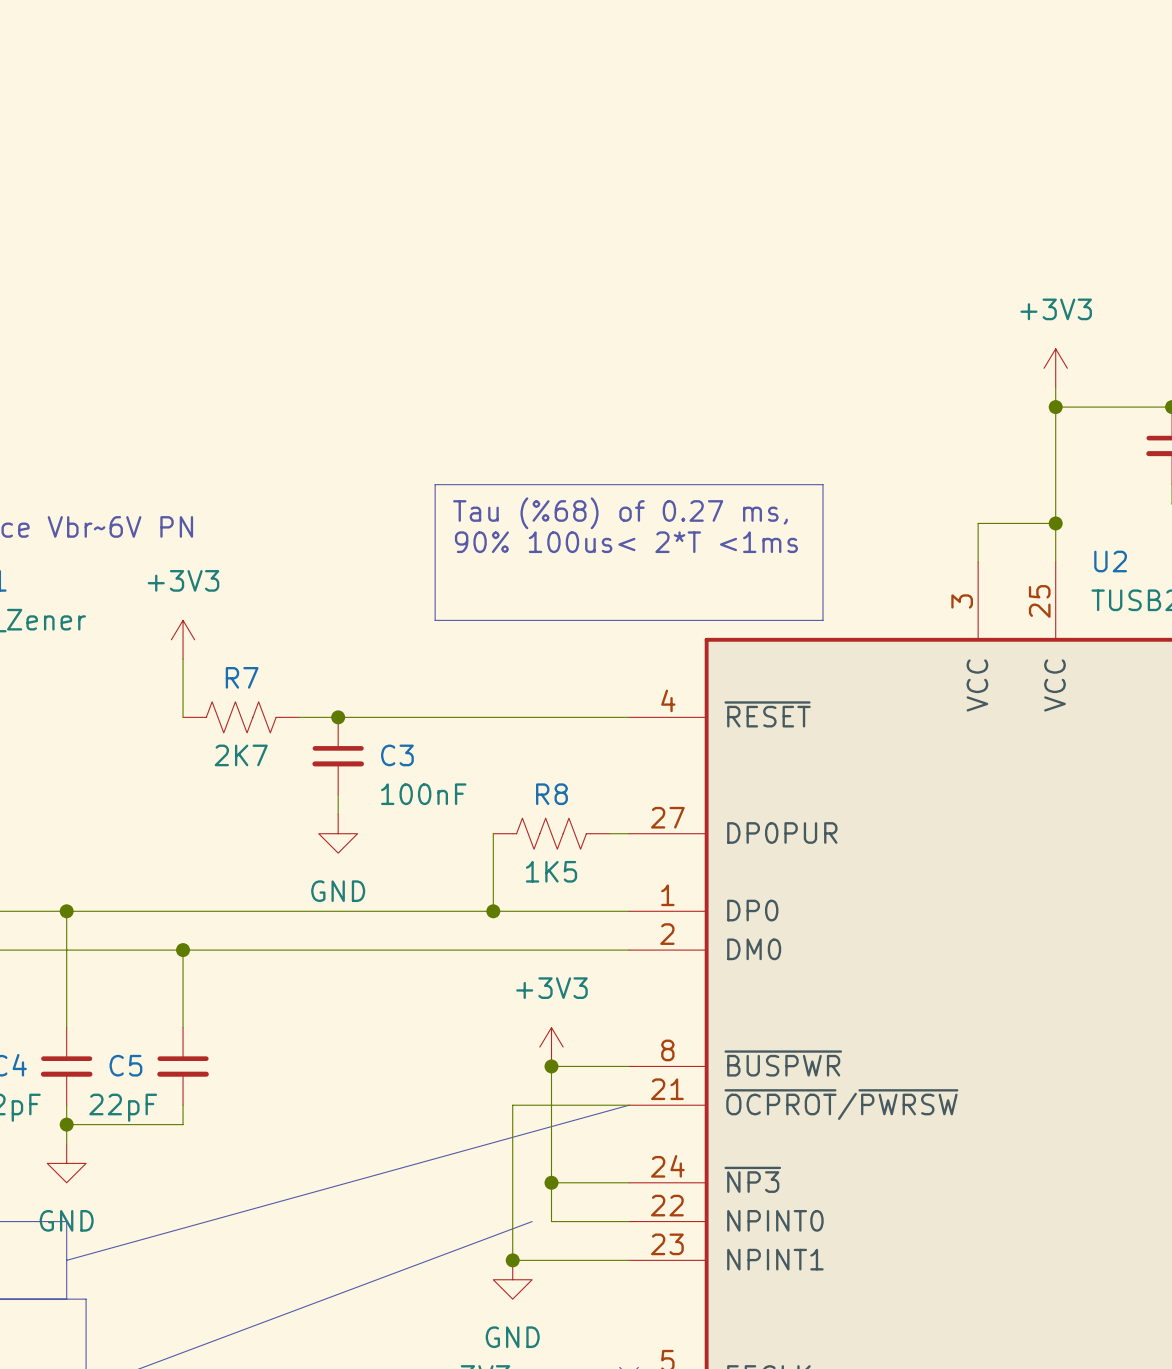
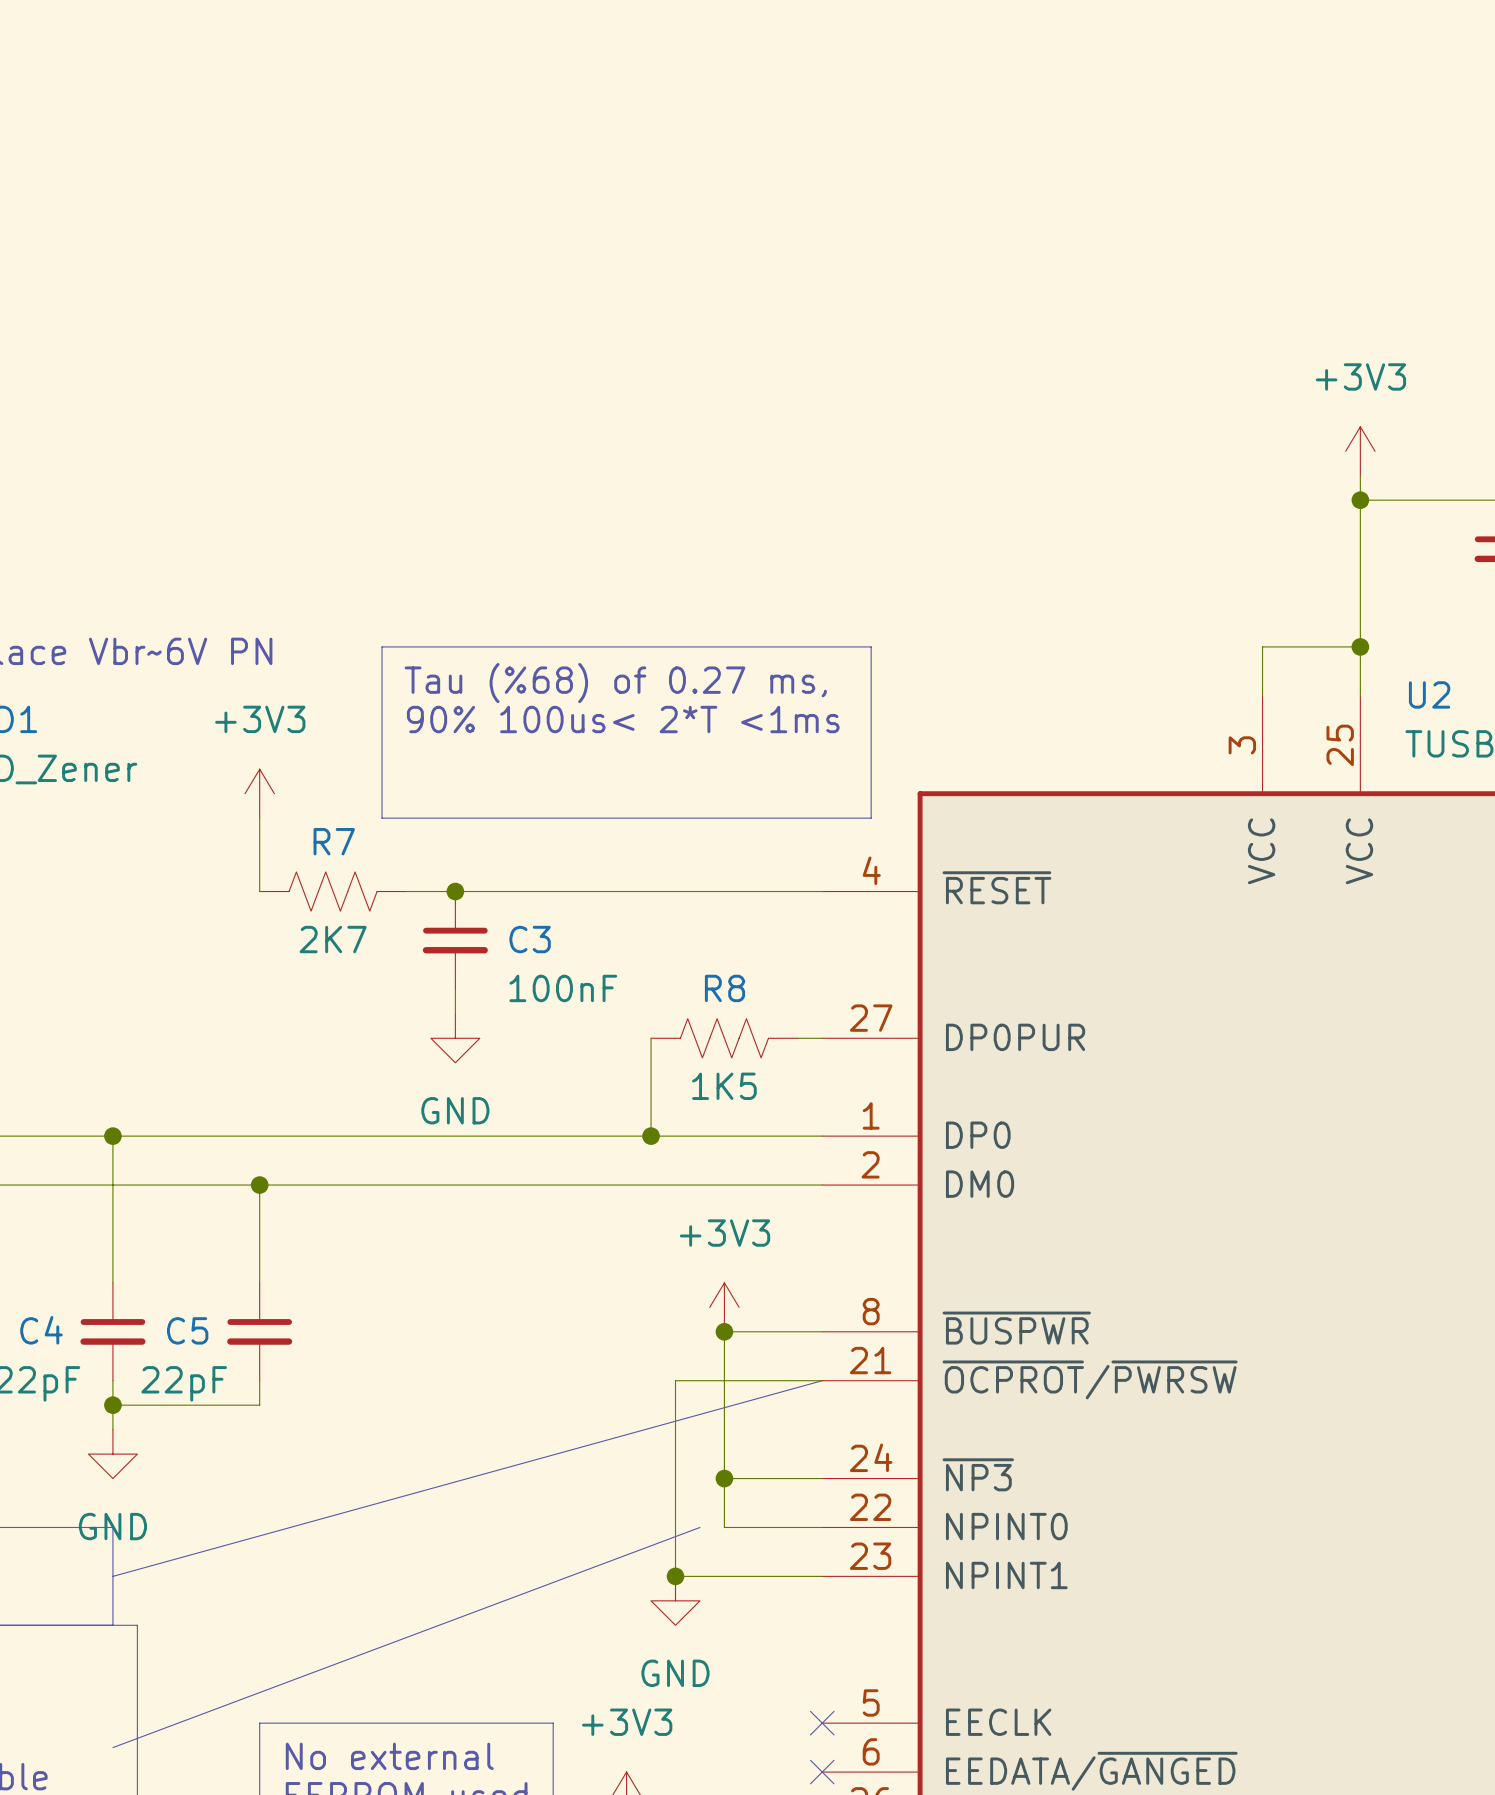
line: (435, 484) (823, 484) (823, 620) (435, 620) (435, 484) -> (381, 646) (871, 646) (871, 818) (381, 818) (381, 646)
text position: Tau (%68) of 0.27 ms, (620, 513) -> Tau (%68) of 0.27 ms, (615, 683)
text position: 90% 100us< 2*T <1ms (626, 542) -> 90% 100us< 2*T <1ms (623, 719)

